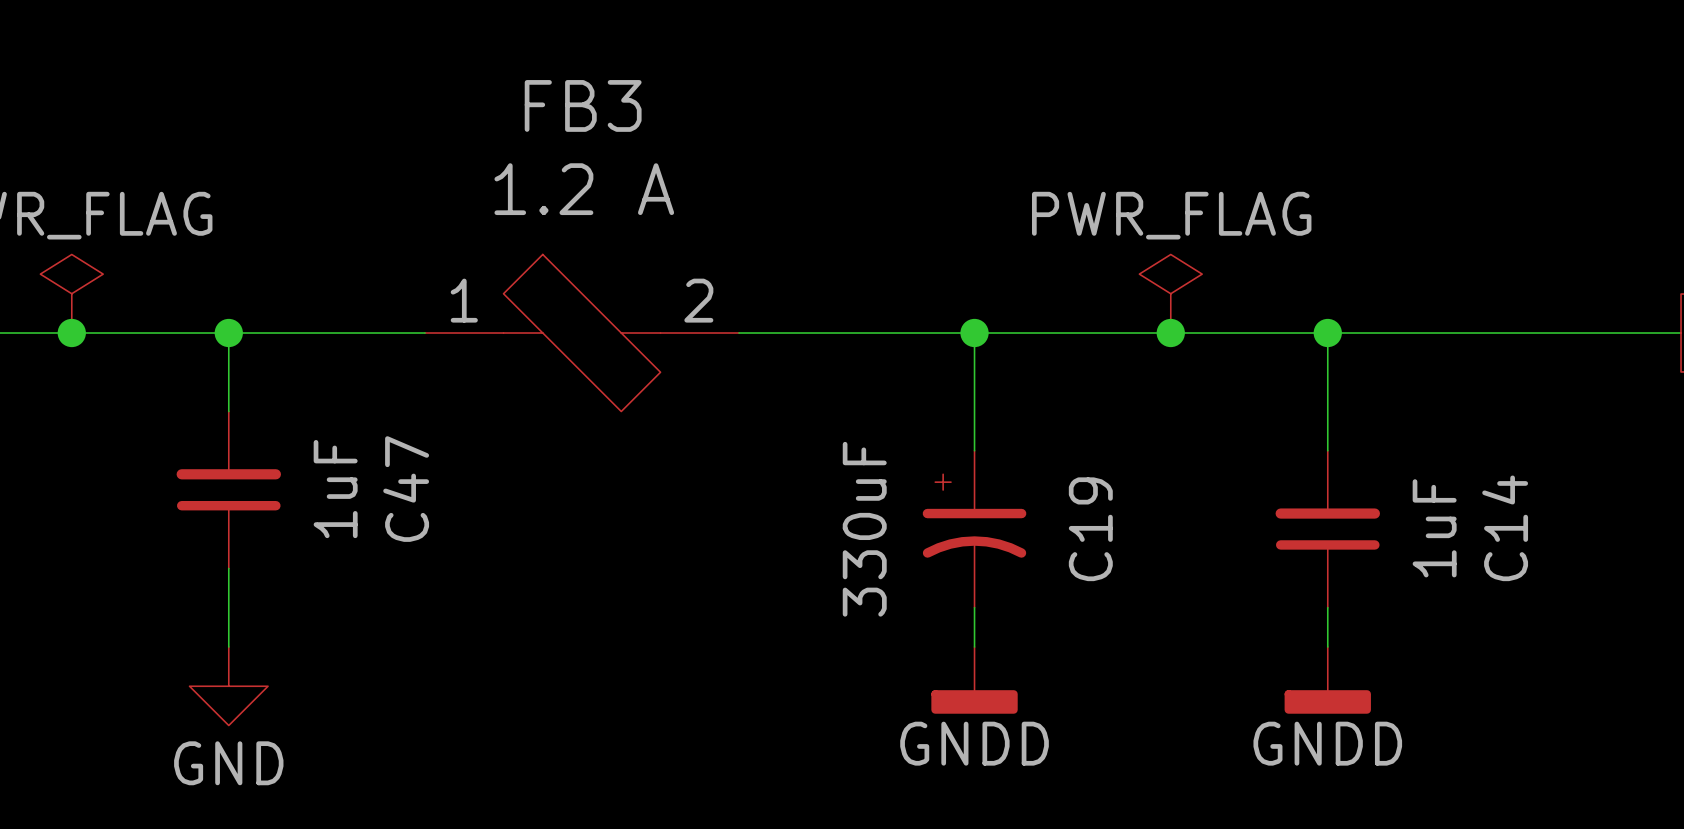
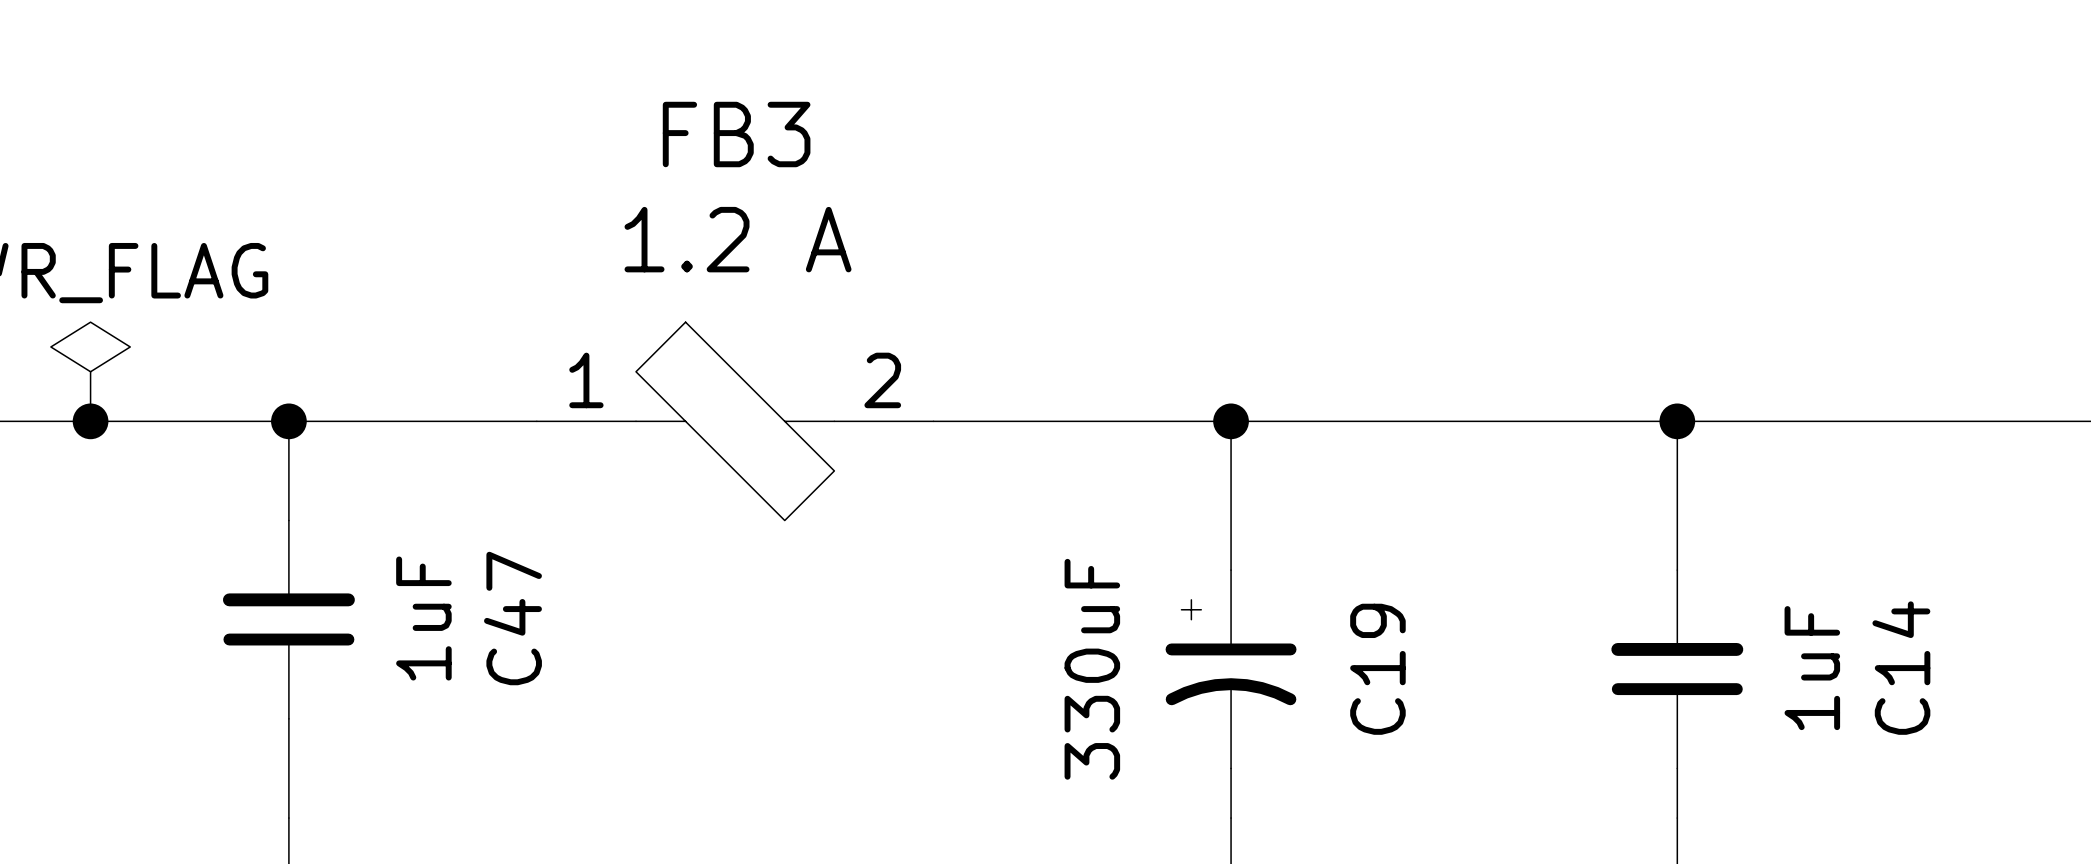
power symbol: PWR_FLAG (1170, 293) -> none
junction: (1170, 333) -> none

